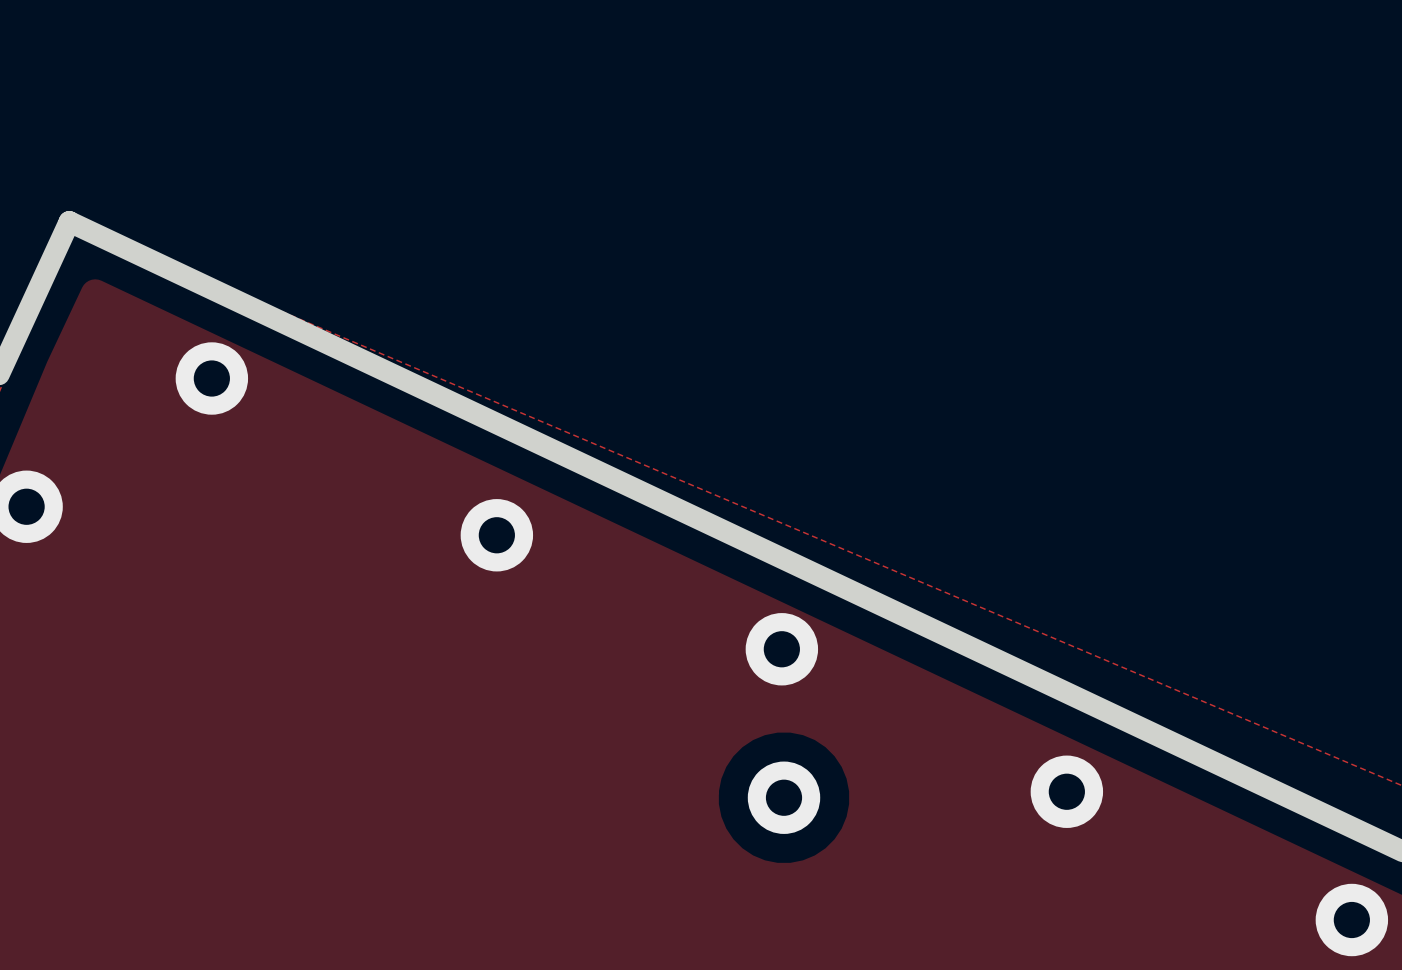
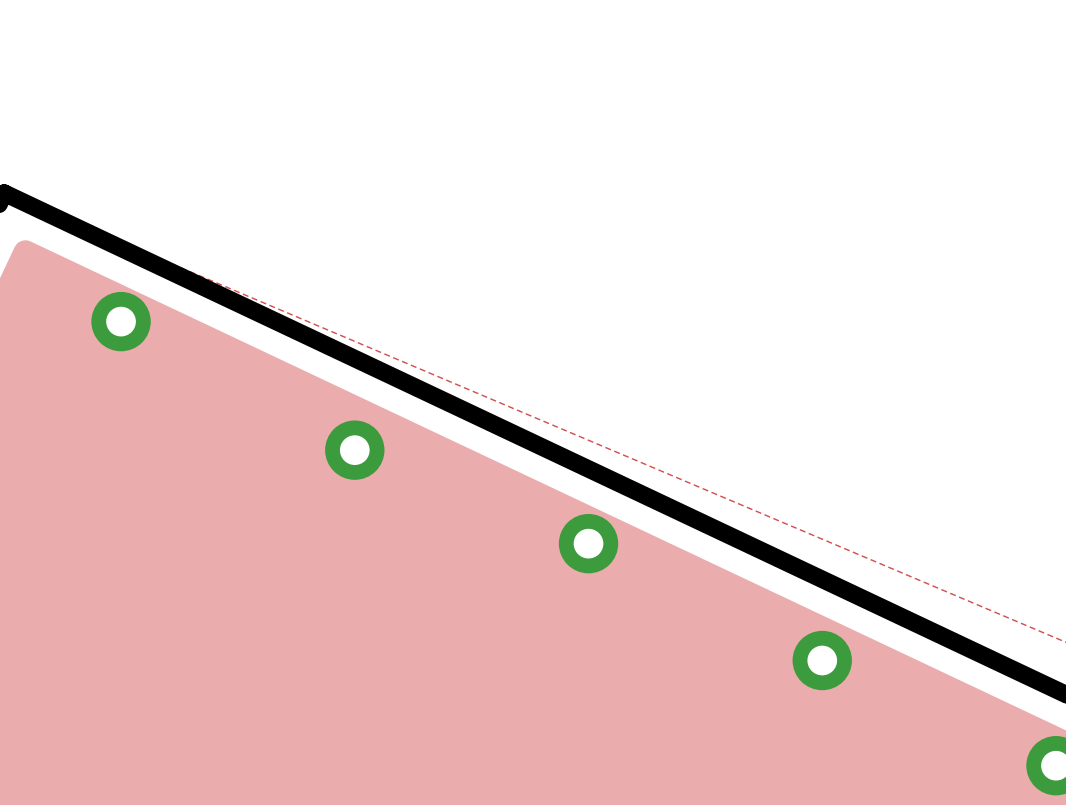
via: (784, 797) -> none

